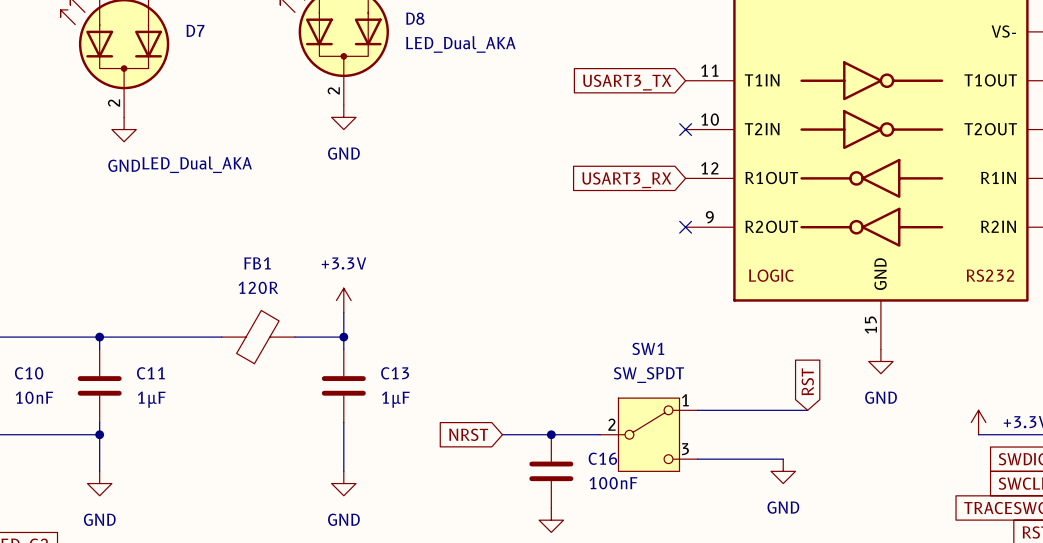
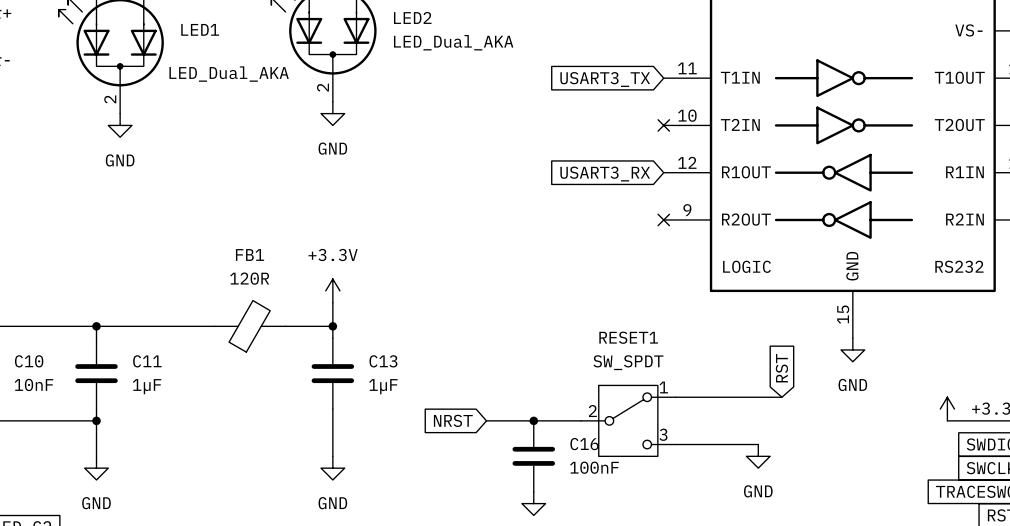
D8 name: D8 (415, 18) -> LED2 (412, 17)
D7 name: D7 (195, 30) -> LED1 (200, 29)
D7 value position: LED_Dual_AKA (197, 164) -> LED_Dual_AKA (229, 74)
SW1 name: SW1 (648, 348) -> RESET1 (628, 337)

